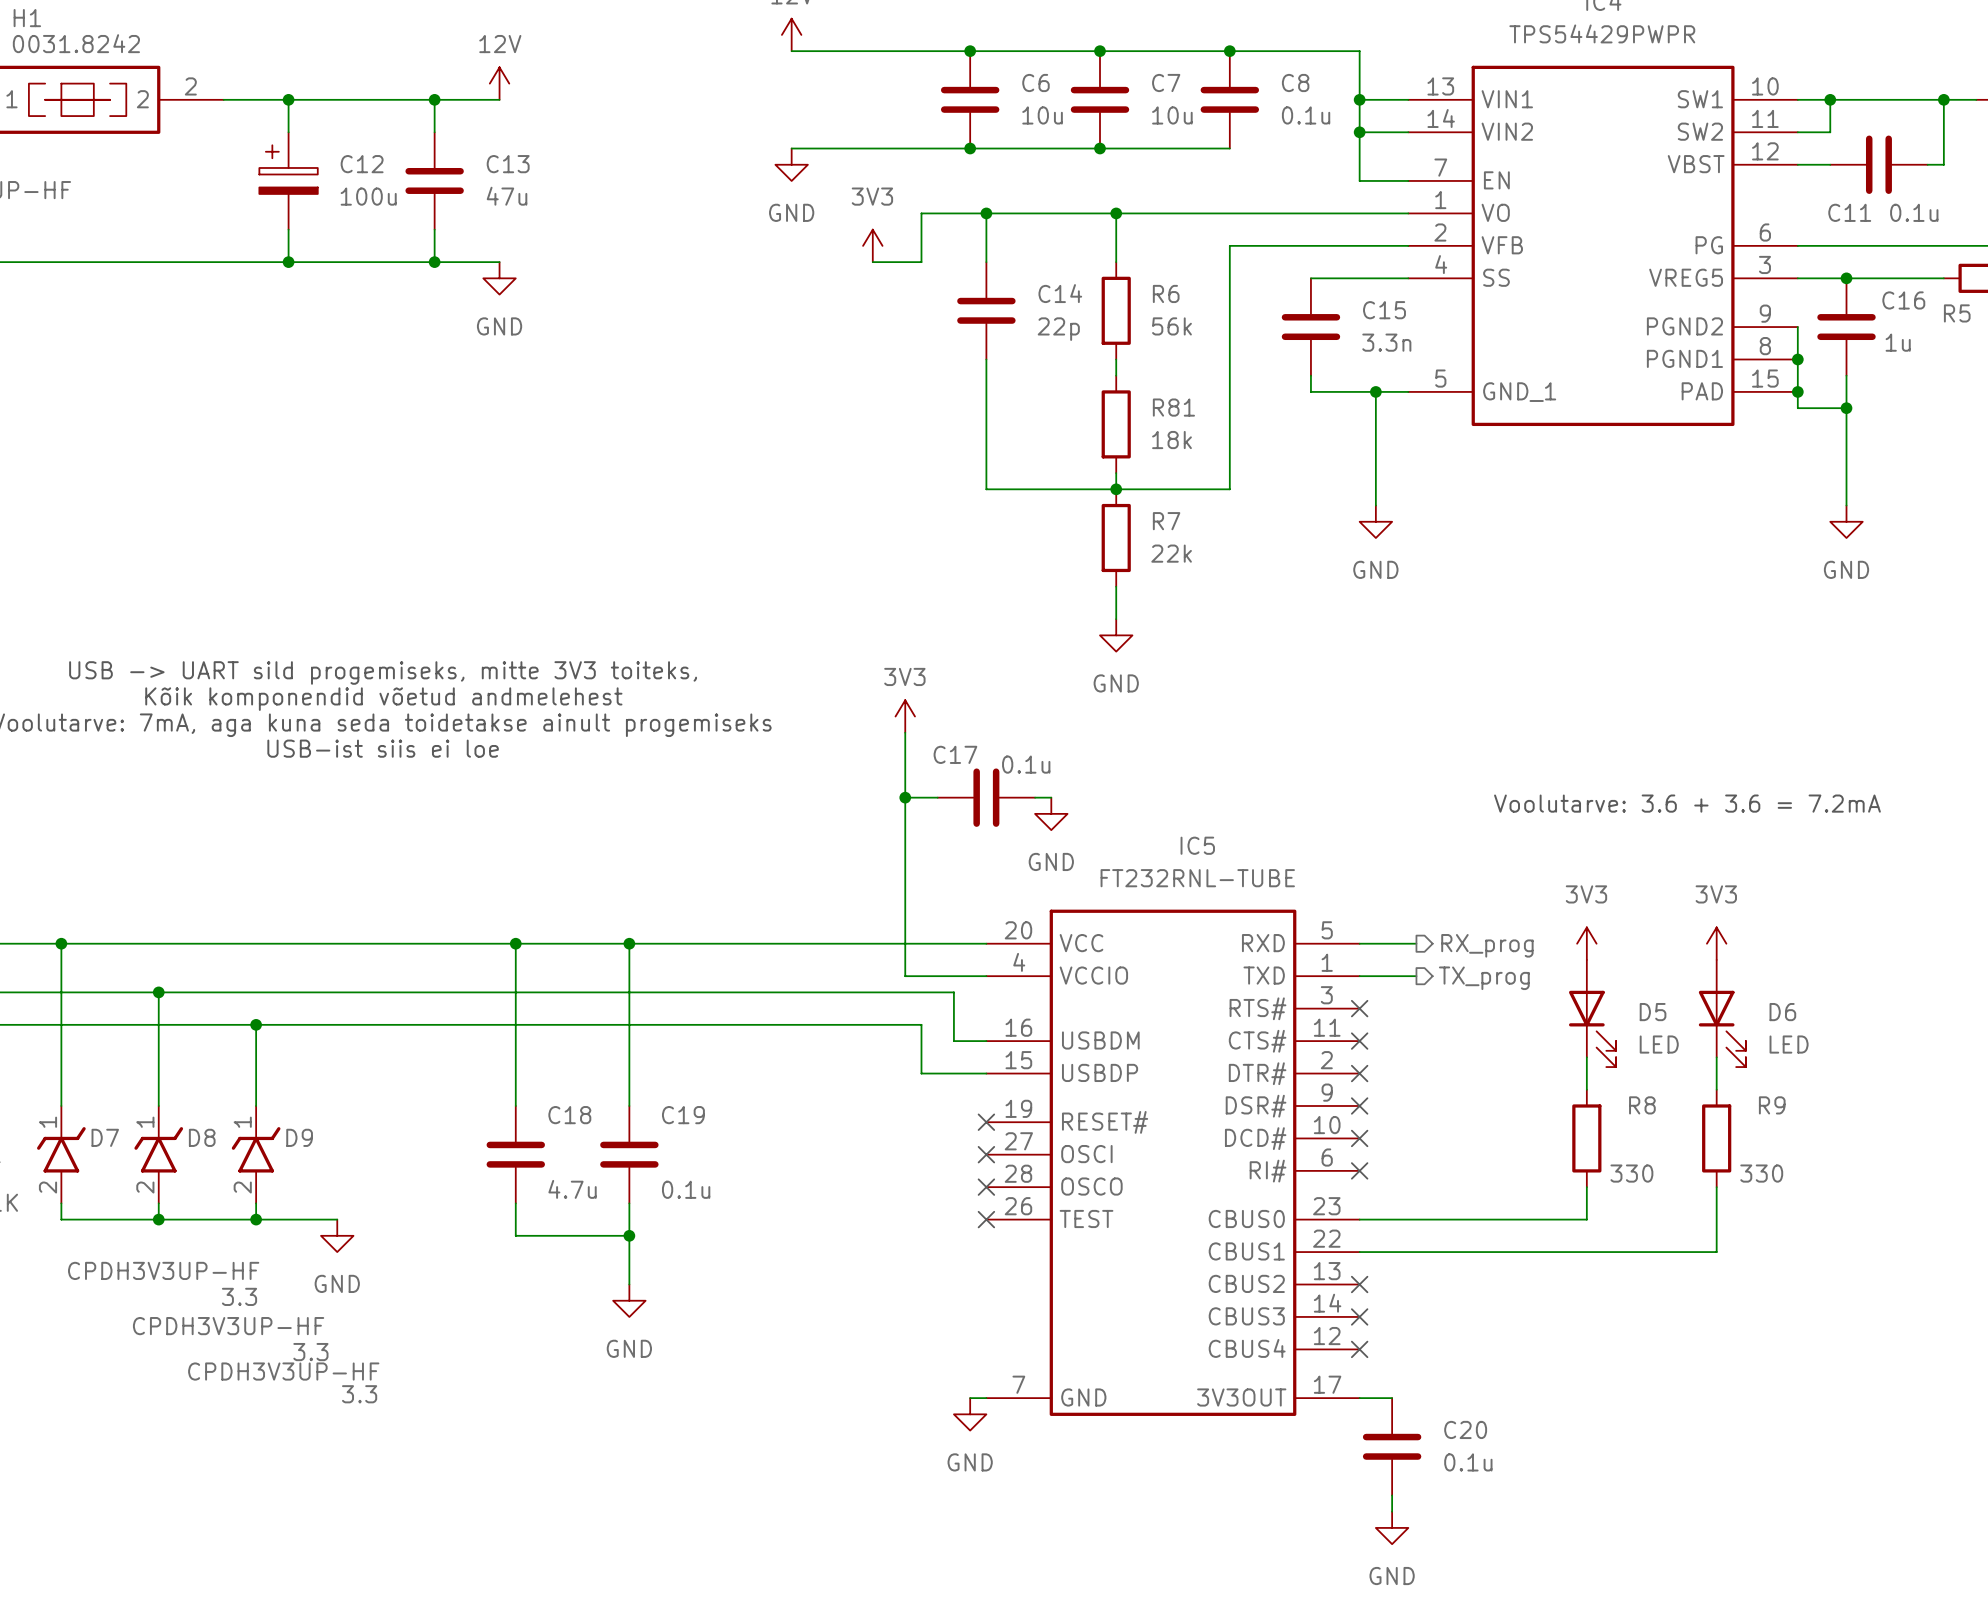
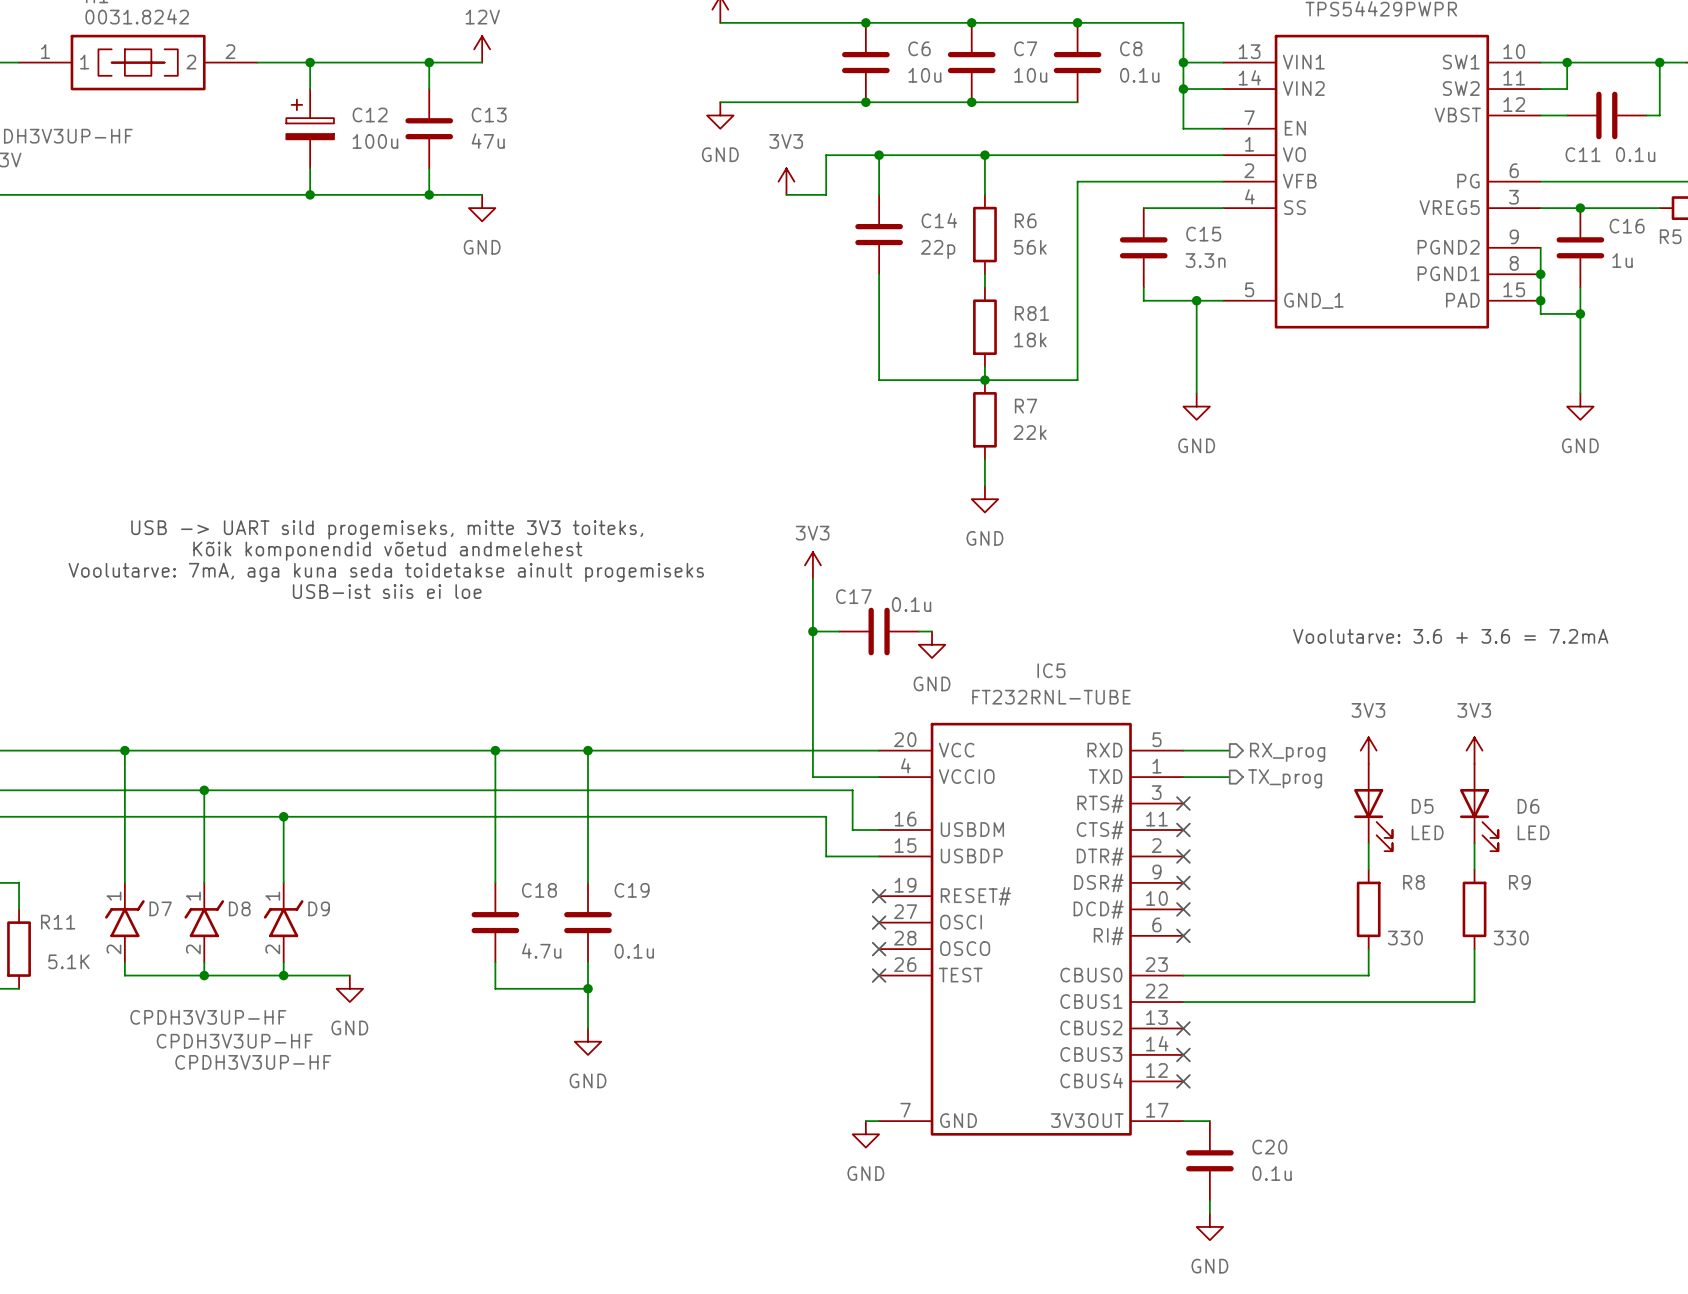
D7 text: 3.3 (239, 1296) -> none
D8 value position: CPDH3V3UP-HF (228, 1326) -> CPDH3V3UP-HF (234, 1041)
D8 text: 3.3 (310, 1352) -> none
D9 value position: CPDH3V3UP-HF (283, 1371) -> CPDH3V3UP-HF (253, 1062)
D9 text: 3.3 (359, 1394) -> none

